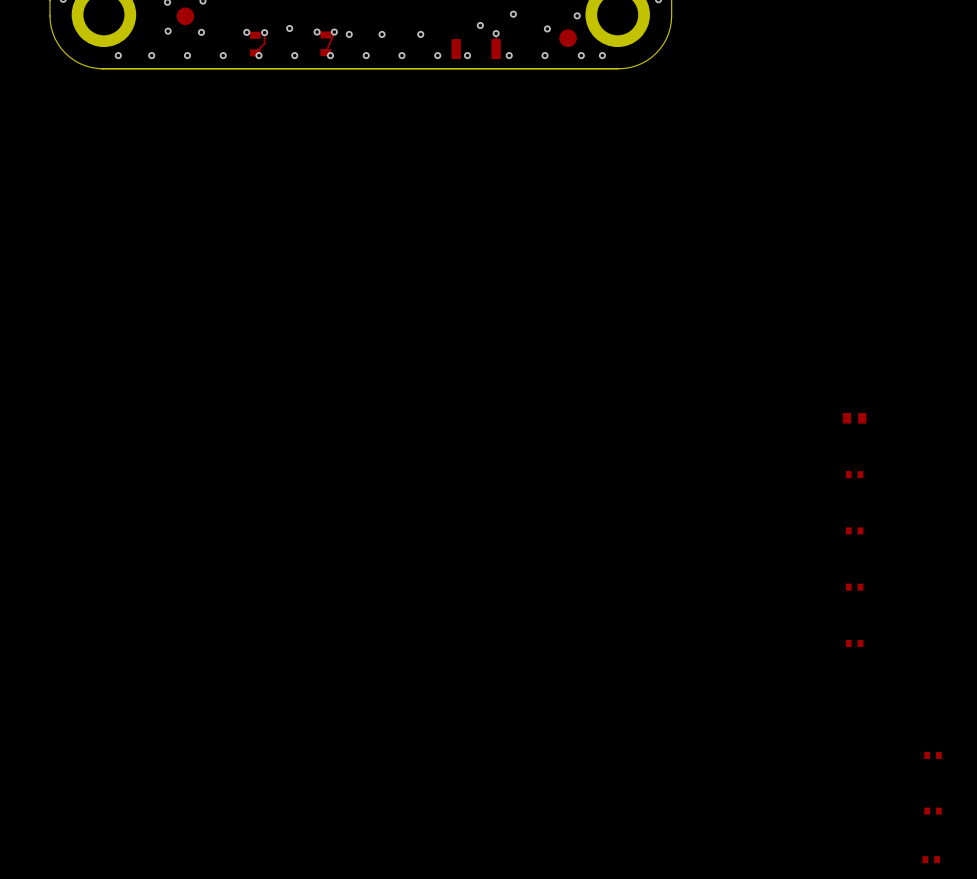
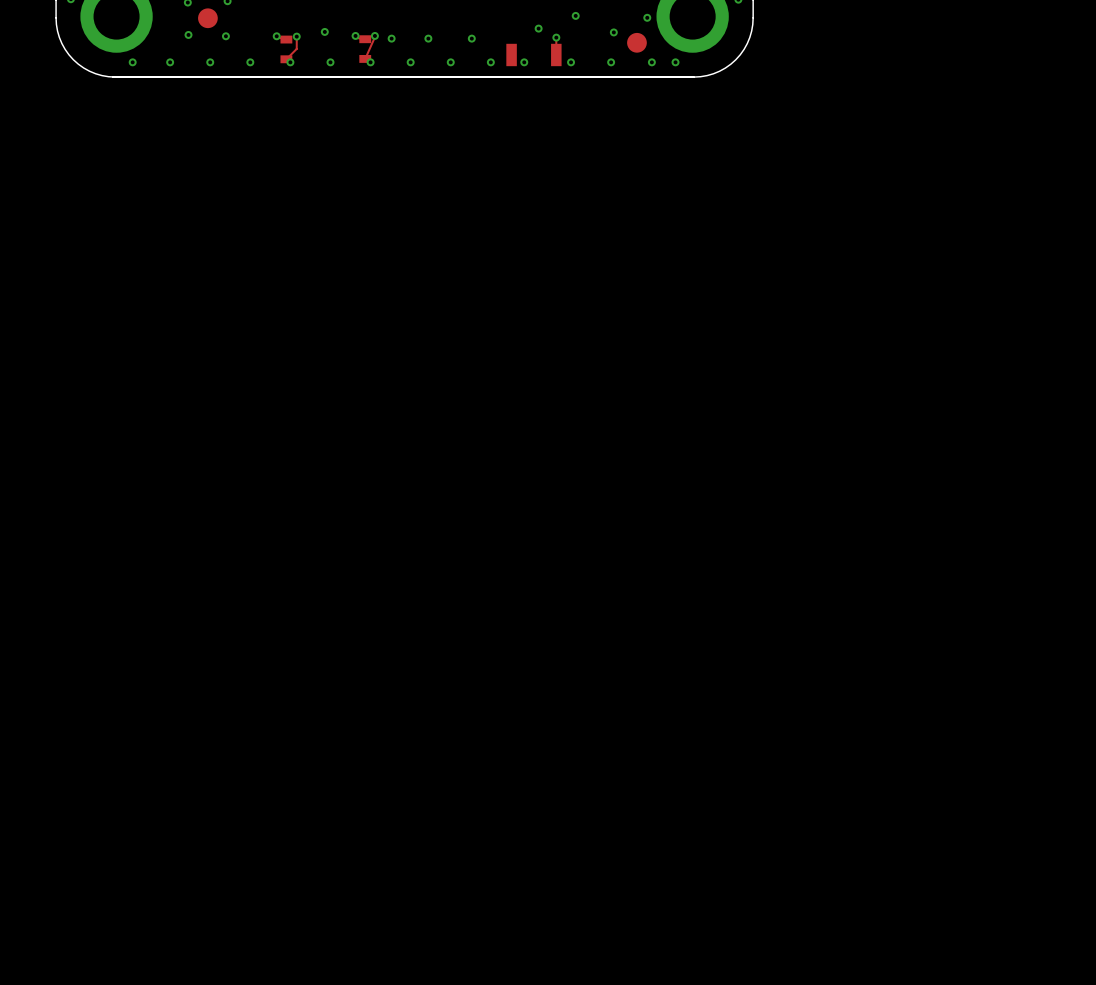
part: (854, 418) -> none
part: (854, 474) -> none
part: (854, 530) -> none
part: (854, 587) -> none
part: (854, 643) -> none
part: (933, 755) -> none
part: (933, 811) -> none
part: (931, 859) -> none

